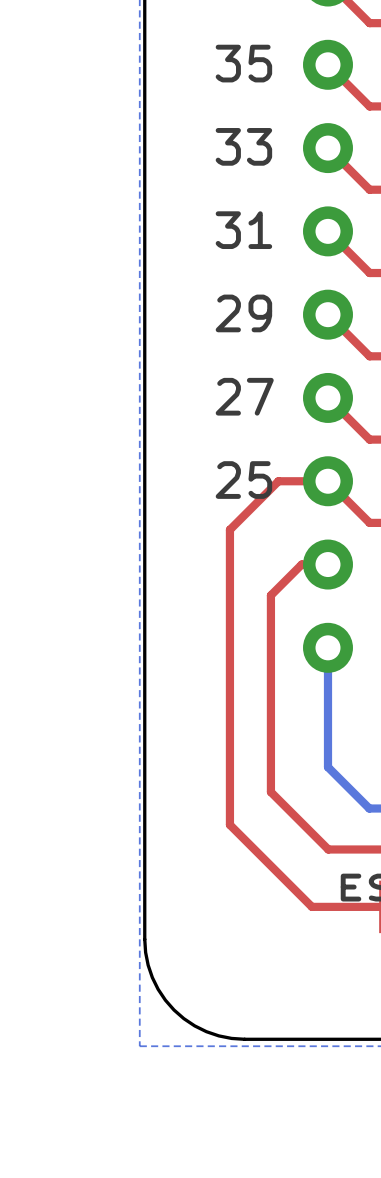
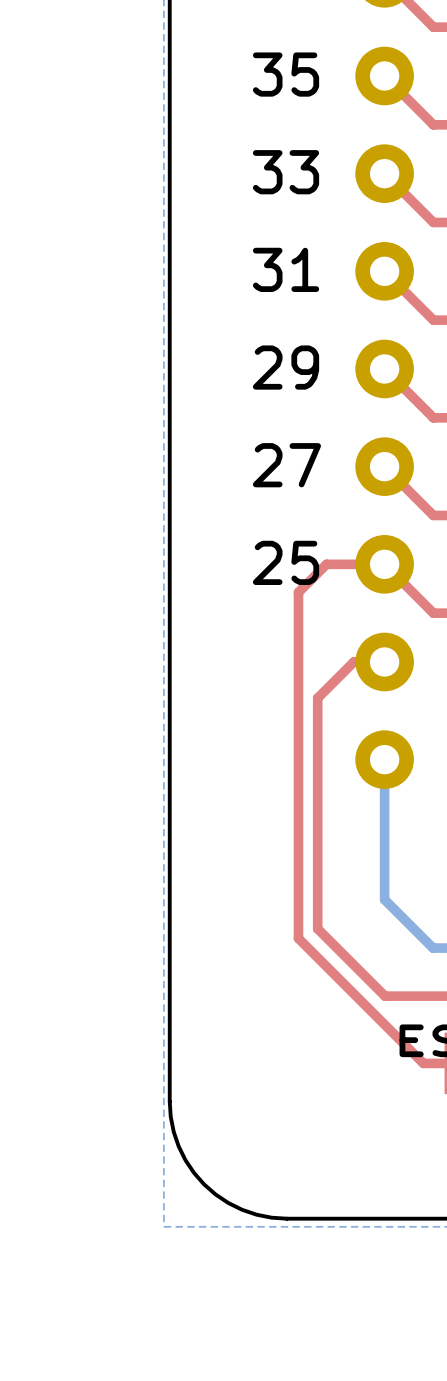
top track: (254, 505) (229, 529) (229, 824) (311, 906) (361, 906) -> (298, 592) (298, 938) (423, 1063)

